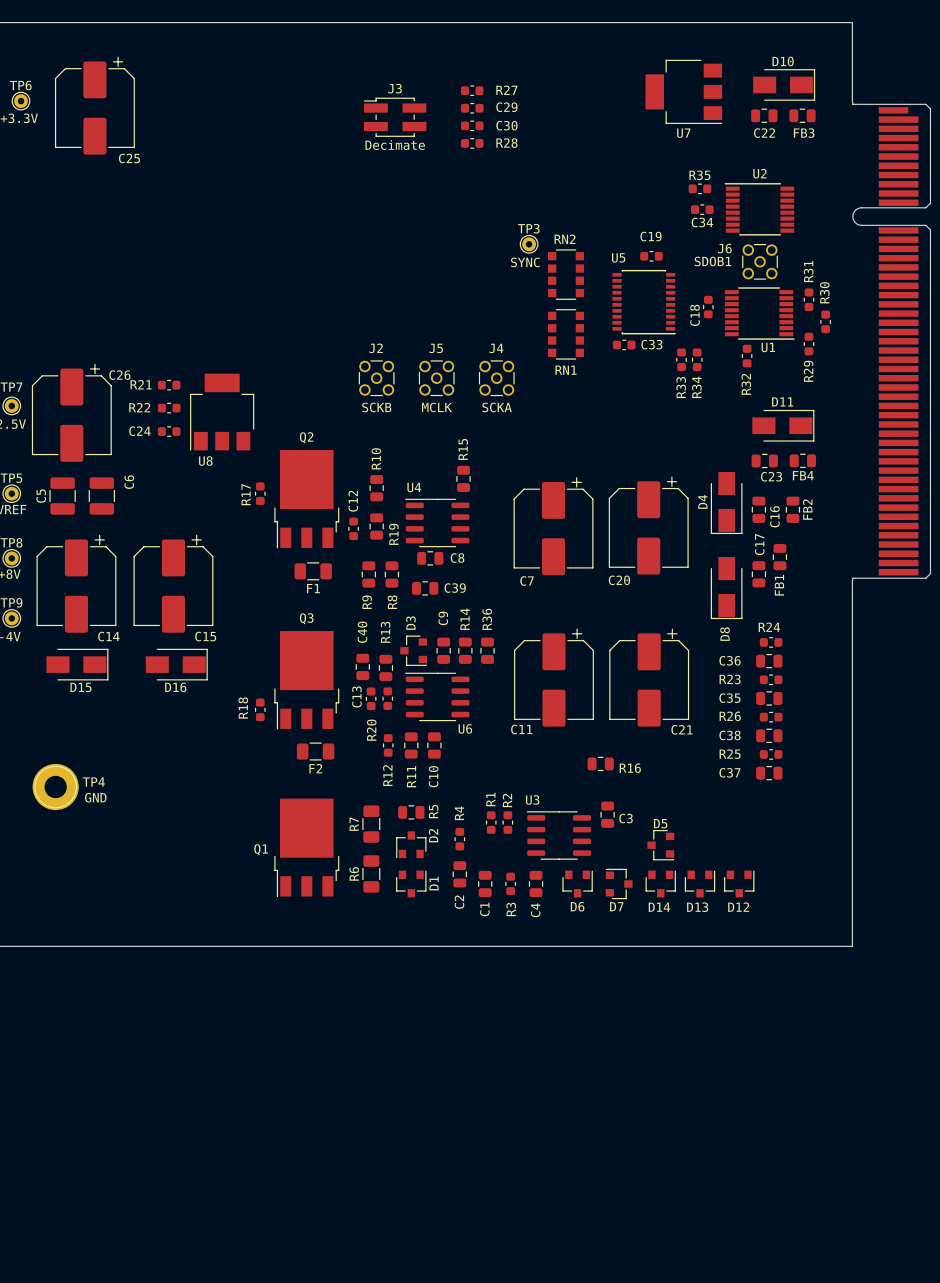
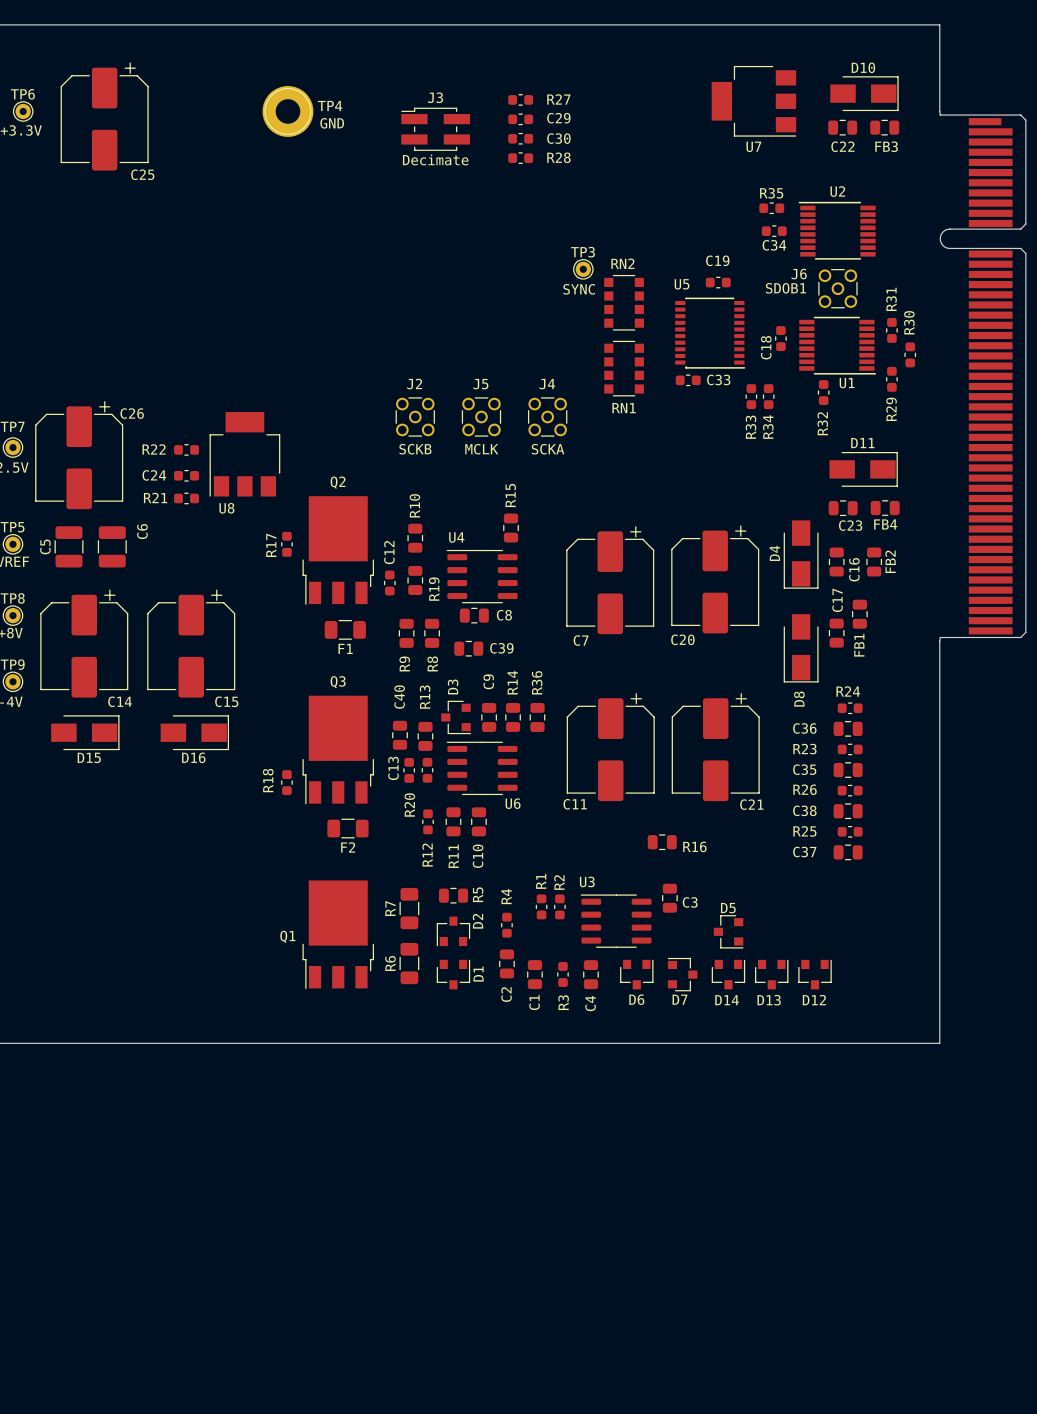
R21 position: (169, 385) -> (186, 498)
TP4 position: (55, 787) -> (287, 111)

